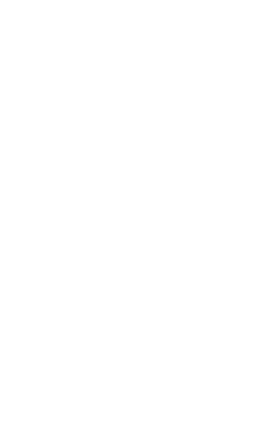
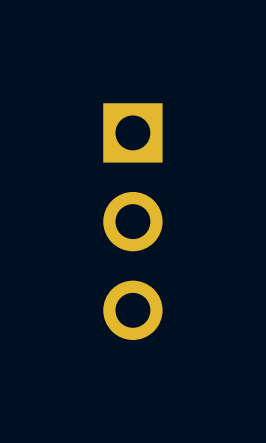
part: none -> (132, 221)

